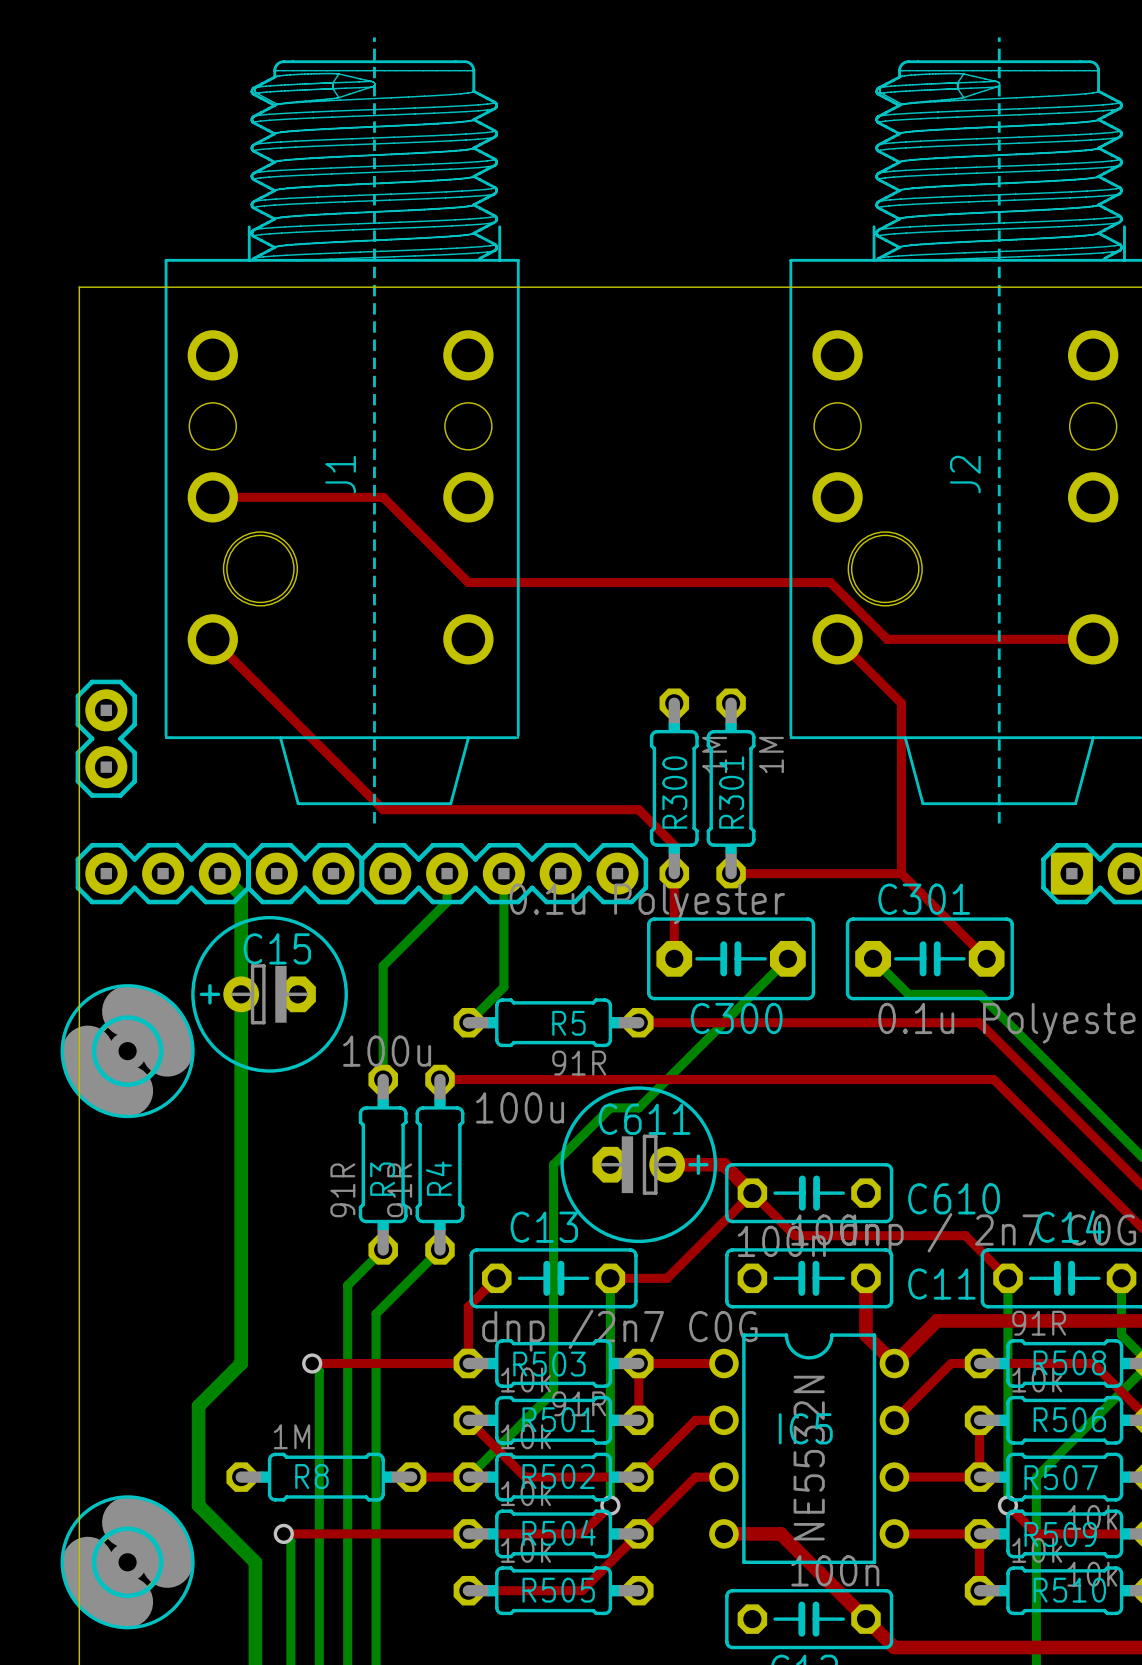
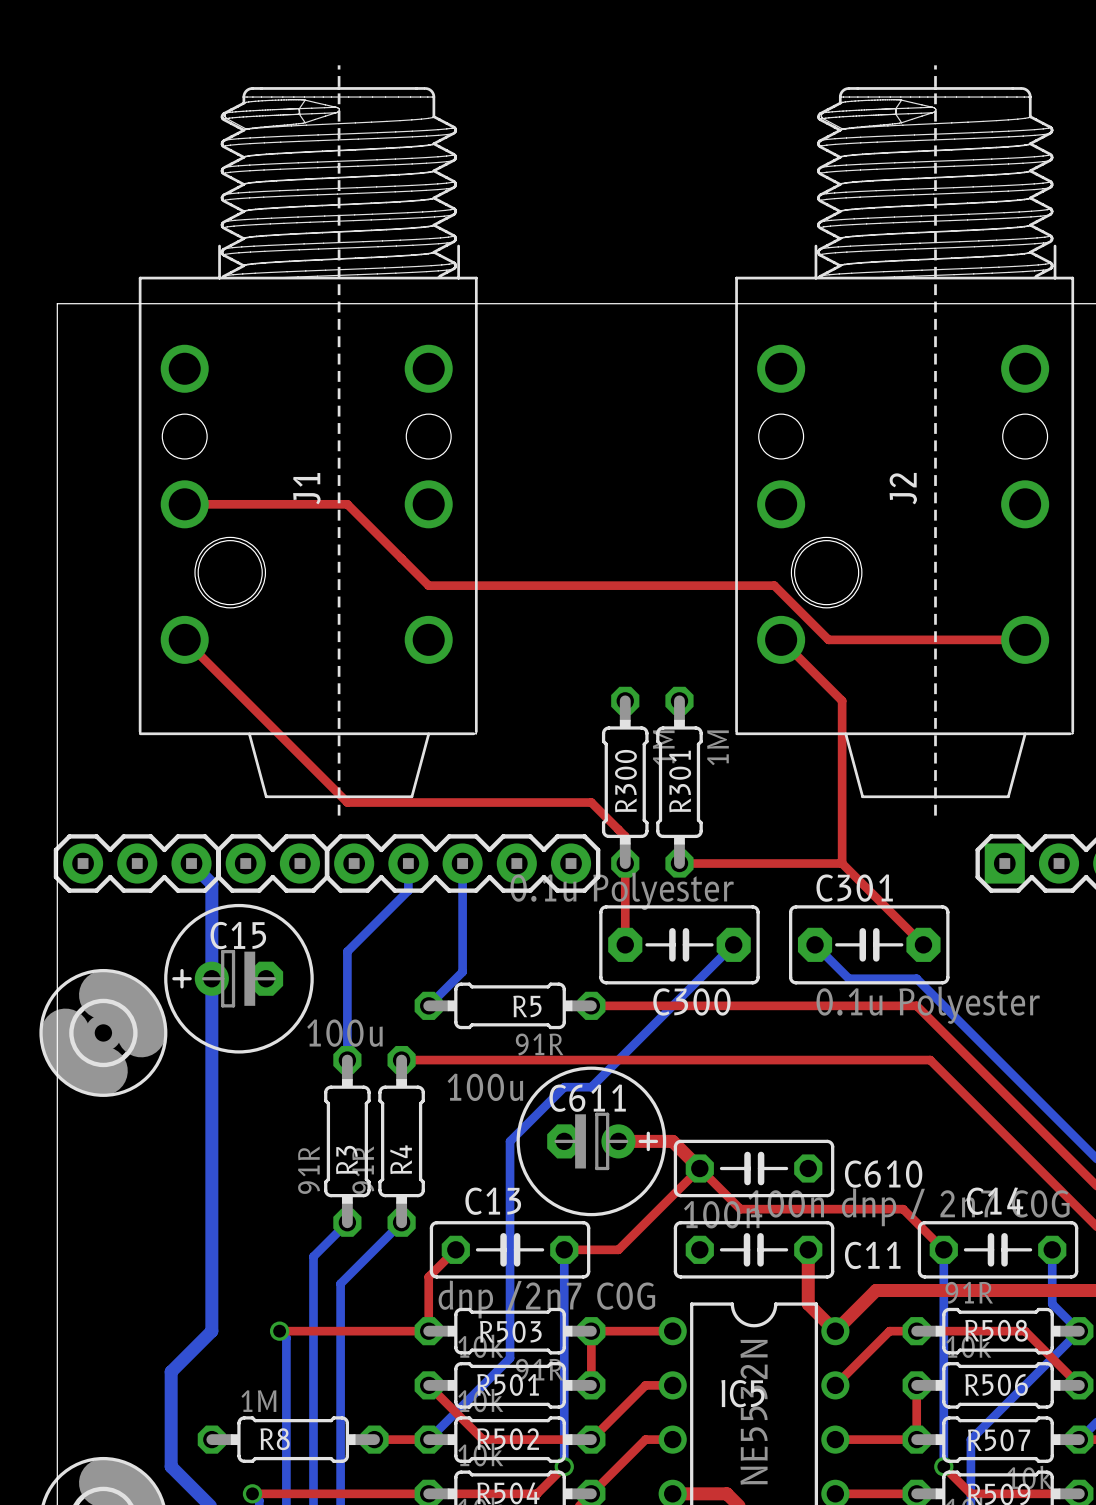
part: (106, 738) -> none

